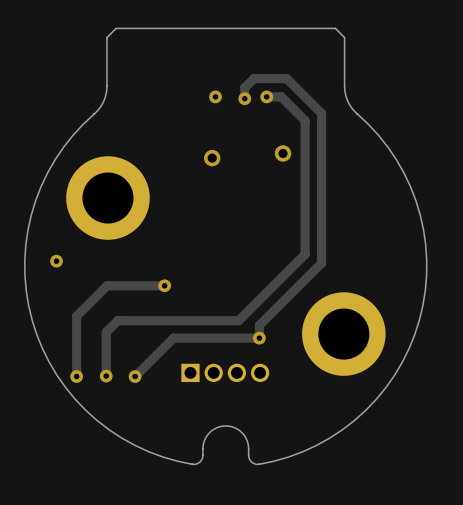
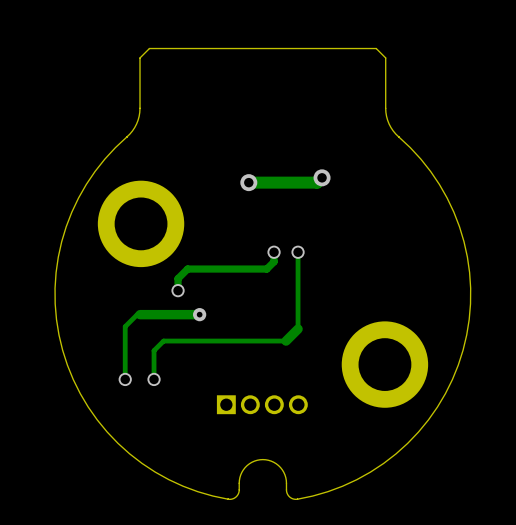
via: (215, 96) -> none
track: (266, 96) (281, 96) (305, 120) (305, 254) (259, 299) -> (298, 252) (298, 329)
via: (266, 96) -> none
track: (244, 98) (244, 87) (253, 78) (286, 78) (321, 113) (321, 263) (259, 325) (259, 338) (173, 338) (135, 376) -> none
via: (244, 98) -> none
track: none -> (322, 177) (317, 182) (248, 182)
track: none -> (274, 252) (274, 261) (266, 269) (187, 269) (178, 278) (178, 290)
via: none -> (274, 252)
via: none -> (298, 252)
via: (56, 261) -> none
via: none -> (178, 290)
track: (107, 285) (76, 316) (76, 376) -> (140, 314) (137, 314) (125, 326) (125, 379)
track: (248, 311) (238, 320) (117, 320) (106, 332) (106, 376) -> (286, 341) (163, 341) (154, 350) (154, 379)
via: (259, 338) -> none
via: none -> (125, 379)
via: none -> (154, 379)
via: (76, 376) -> none
via: (106, 376) -> none
via: (135, 376) -> none

